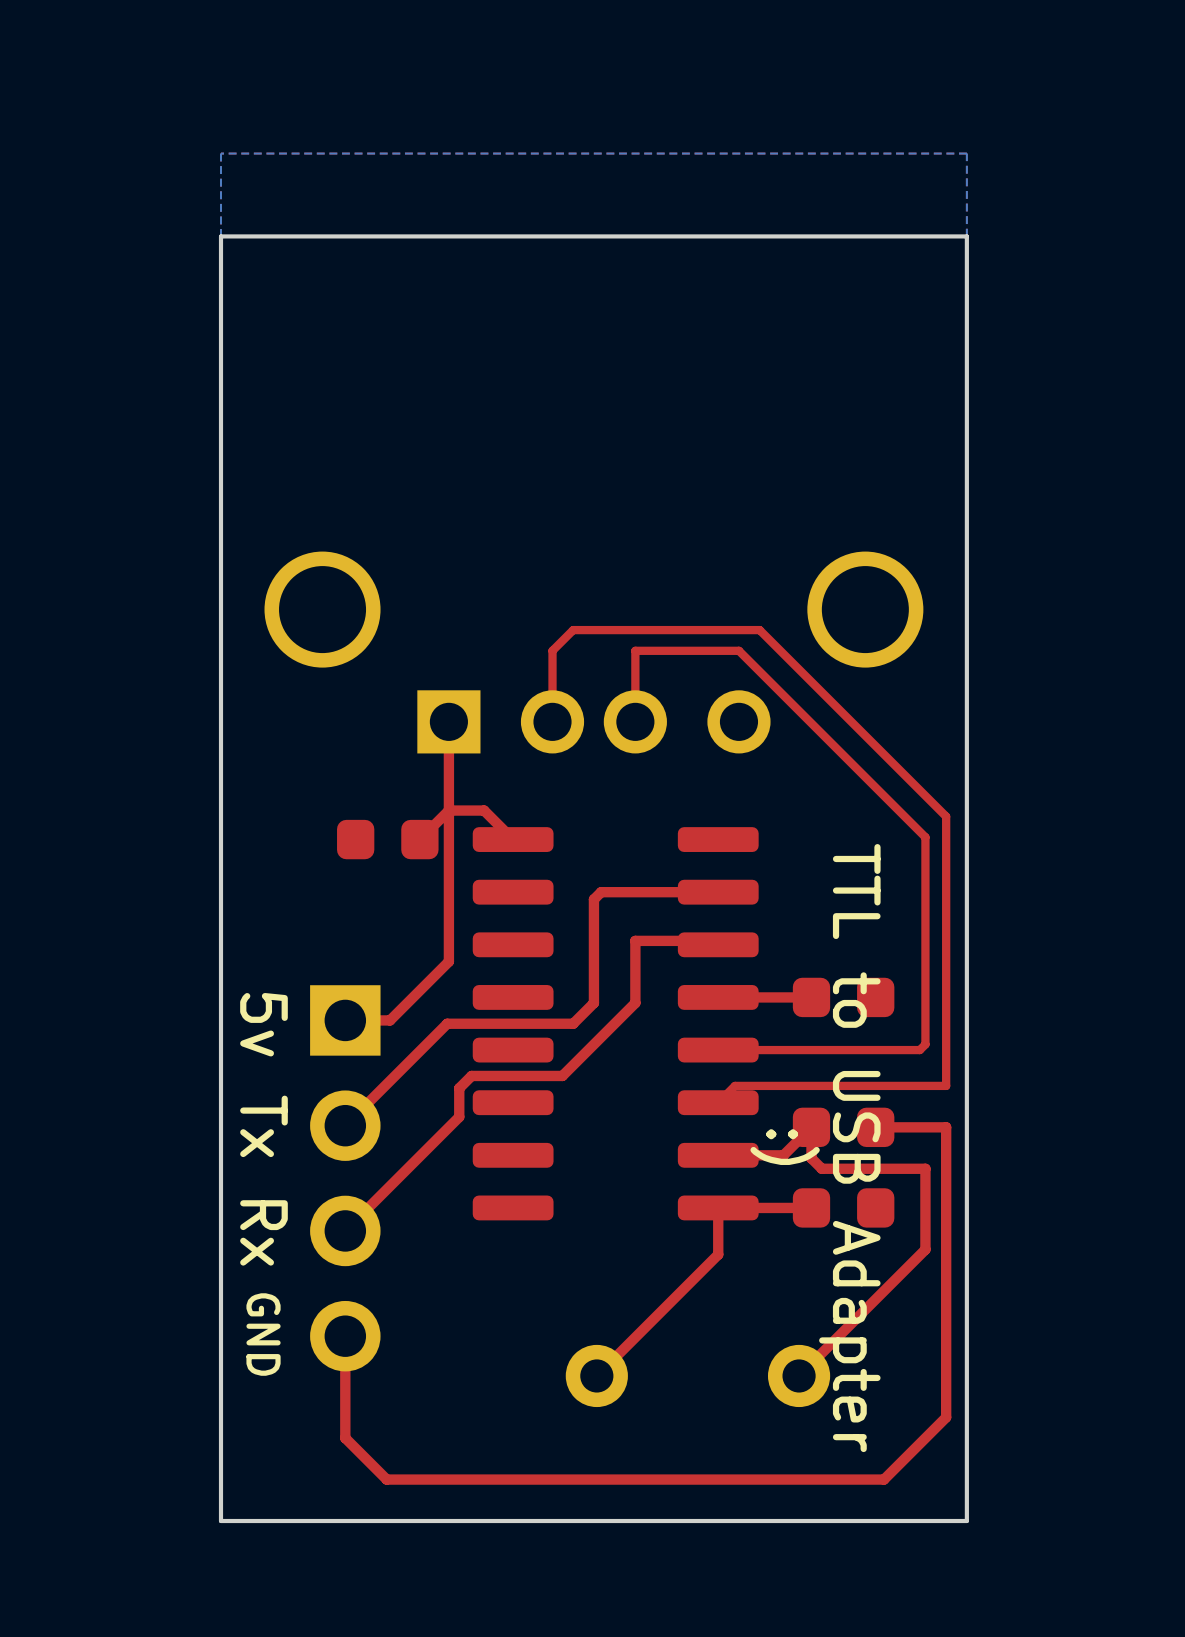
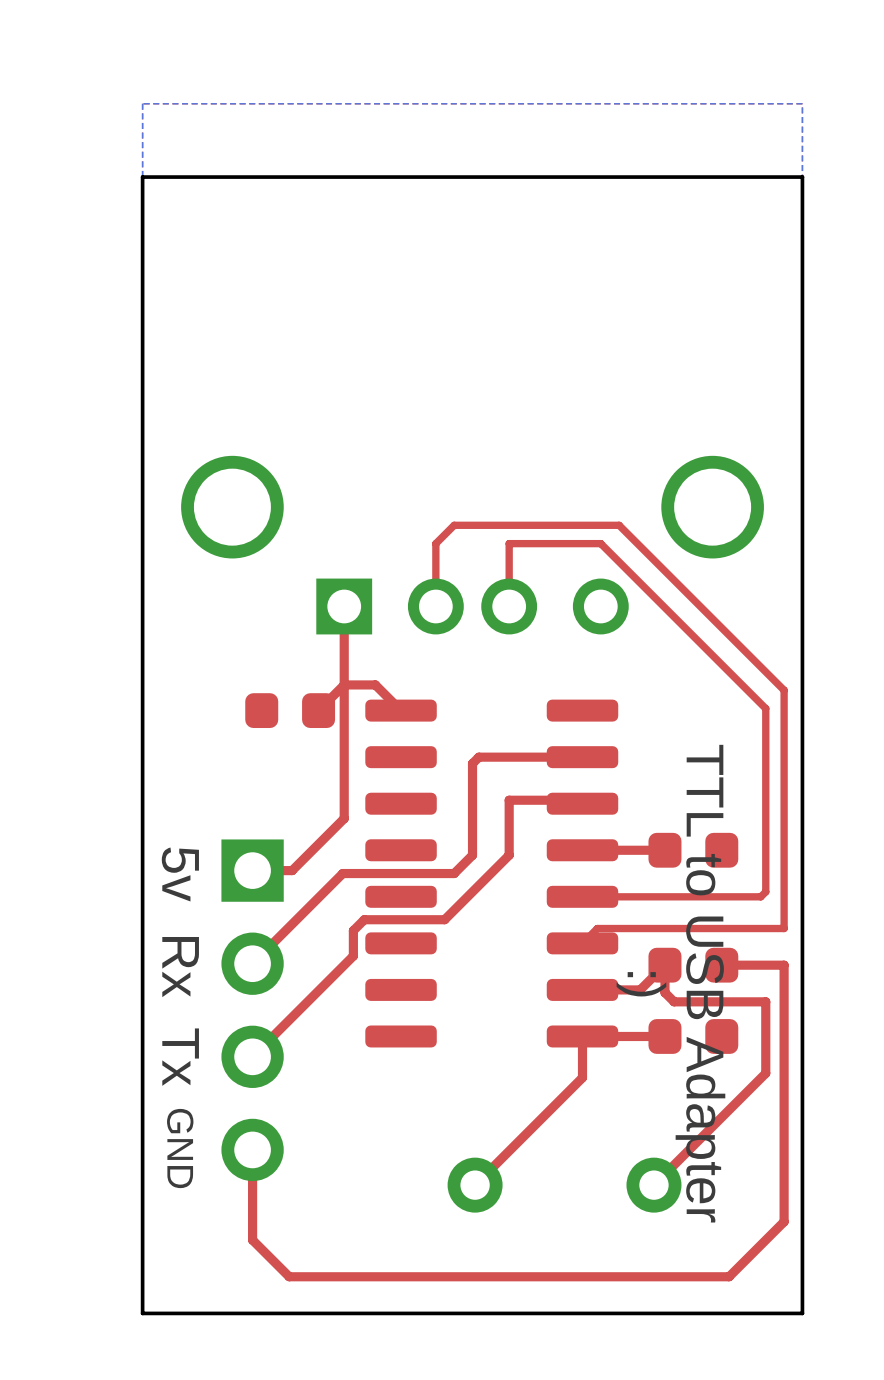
text: Tx (263, 1126) -> Rx (180, 967)
text: Rx (263, 1232) -> Tx (180, 1057)

